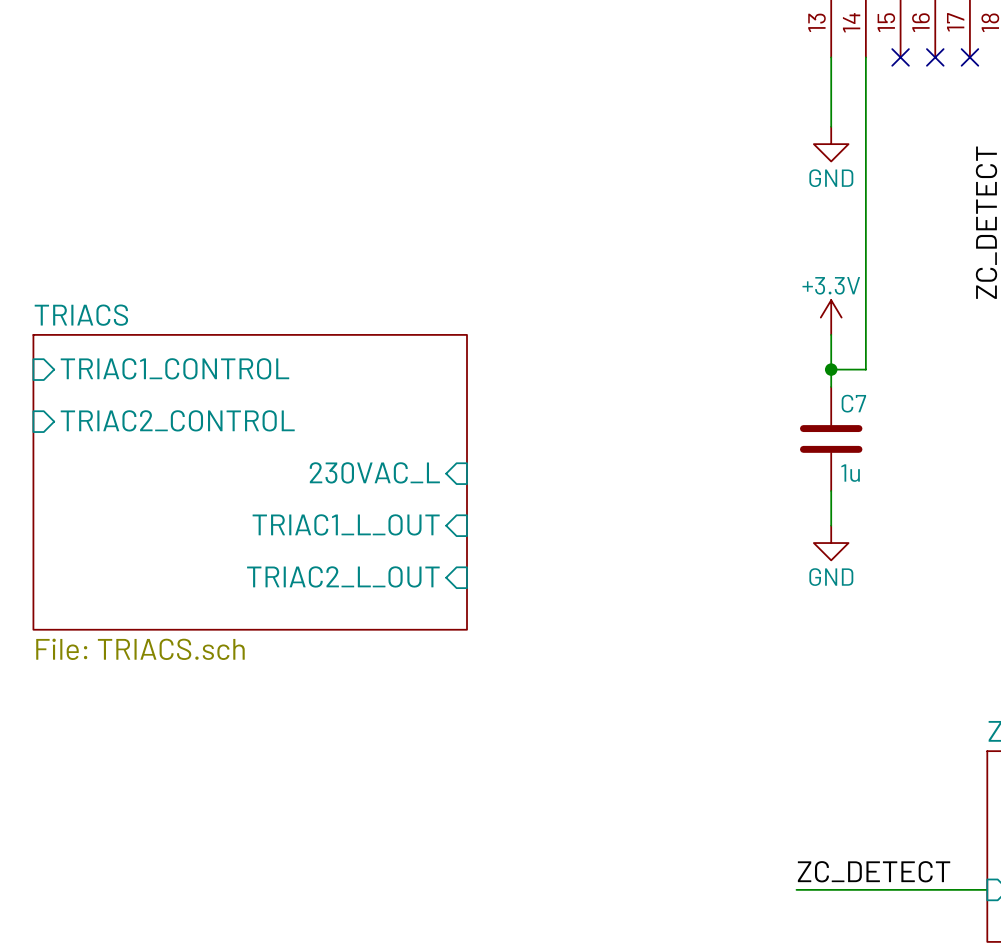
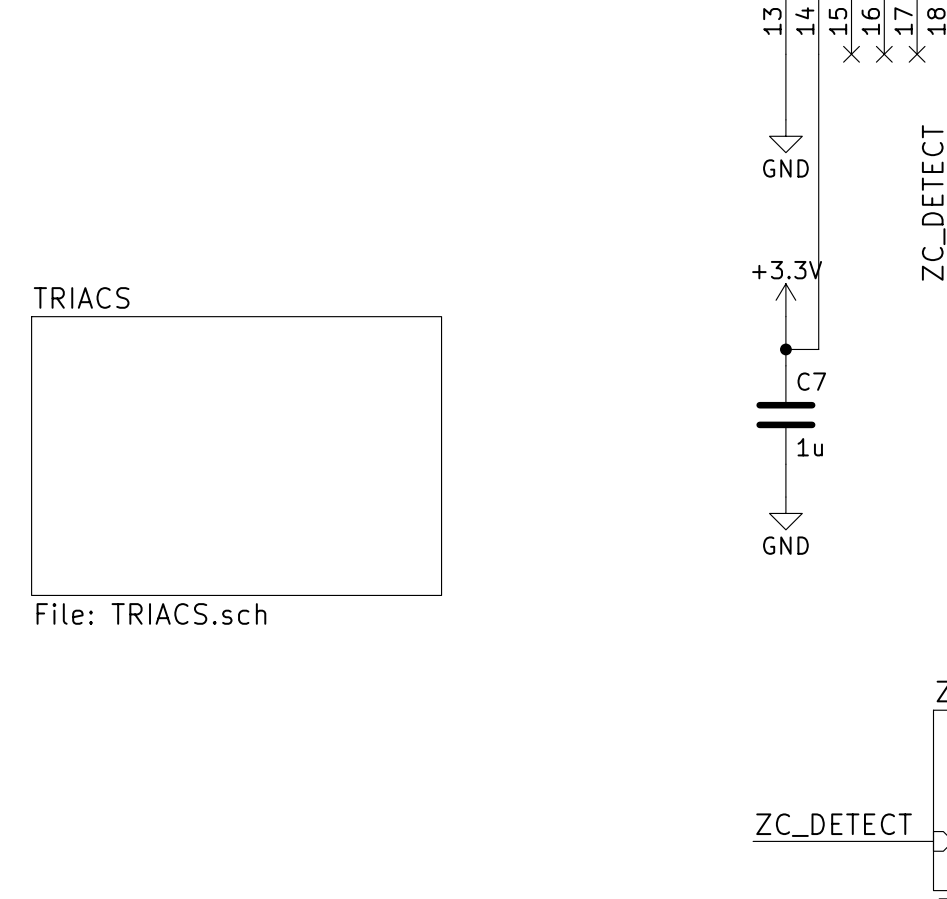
sheet pin: TRIAC1_CONTROL (174, 368) -> none
sheet pin: TRIAC2_CONTROL (177, 420) -> none
sheet pin: 230VAC_L (374, 472) -> none
sheet pin: TRIAC1_L_OUT (346, 524) -> none
sheet pin: TRIAC2_L_OUT (343, 576) -> none

